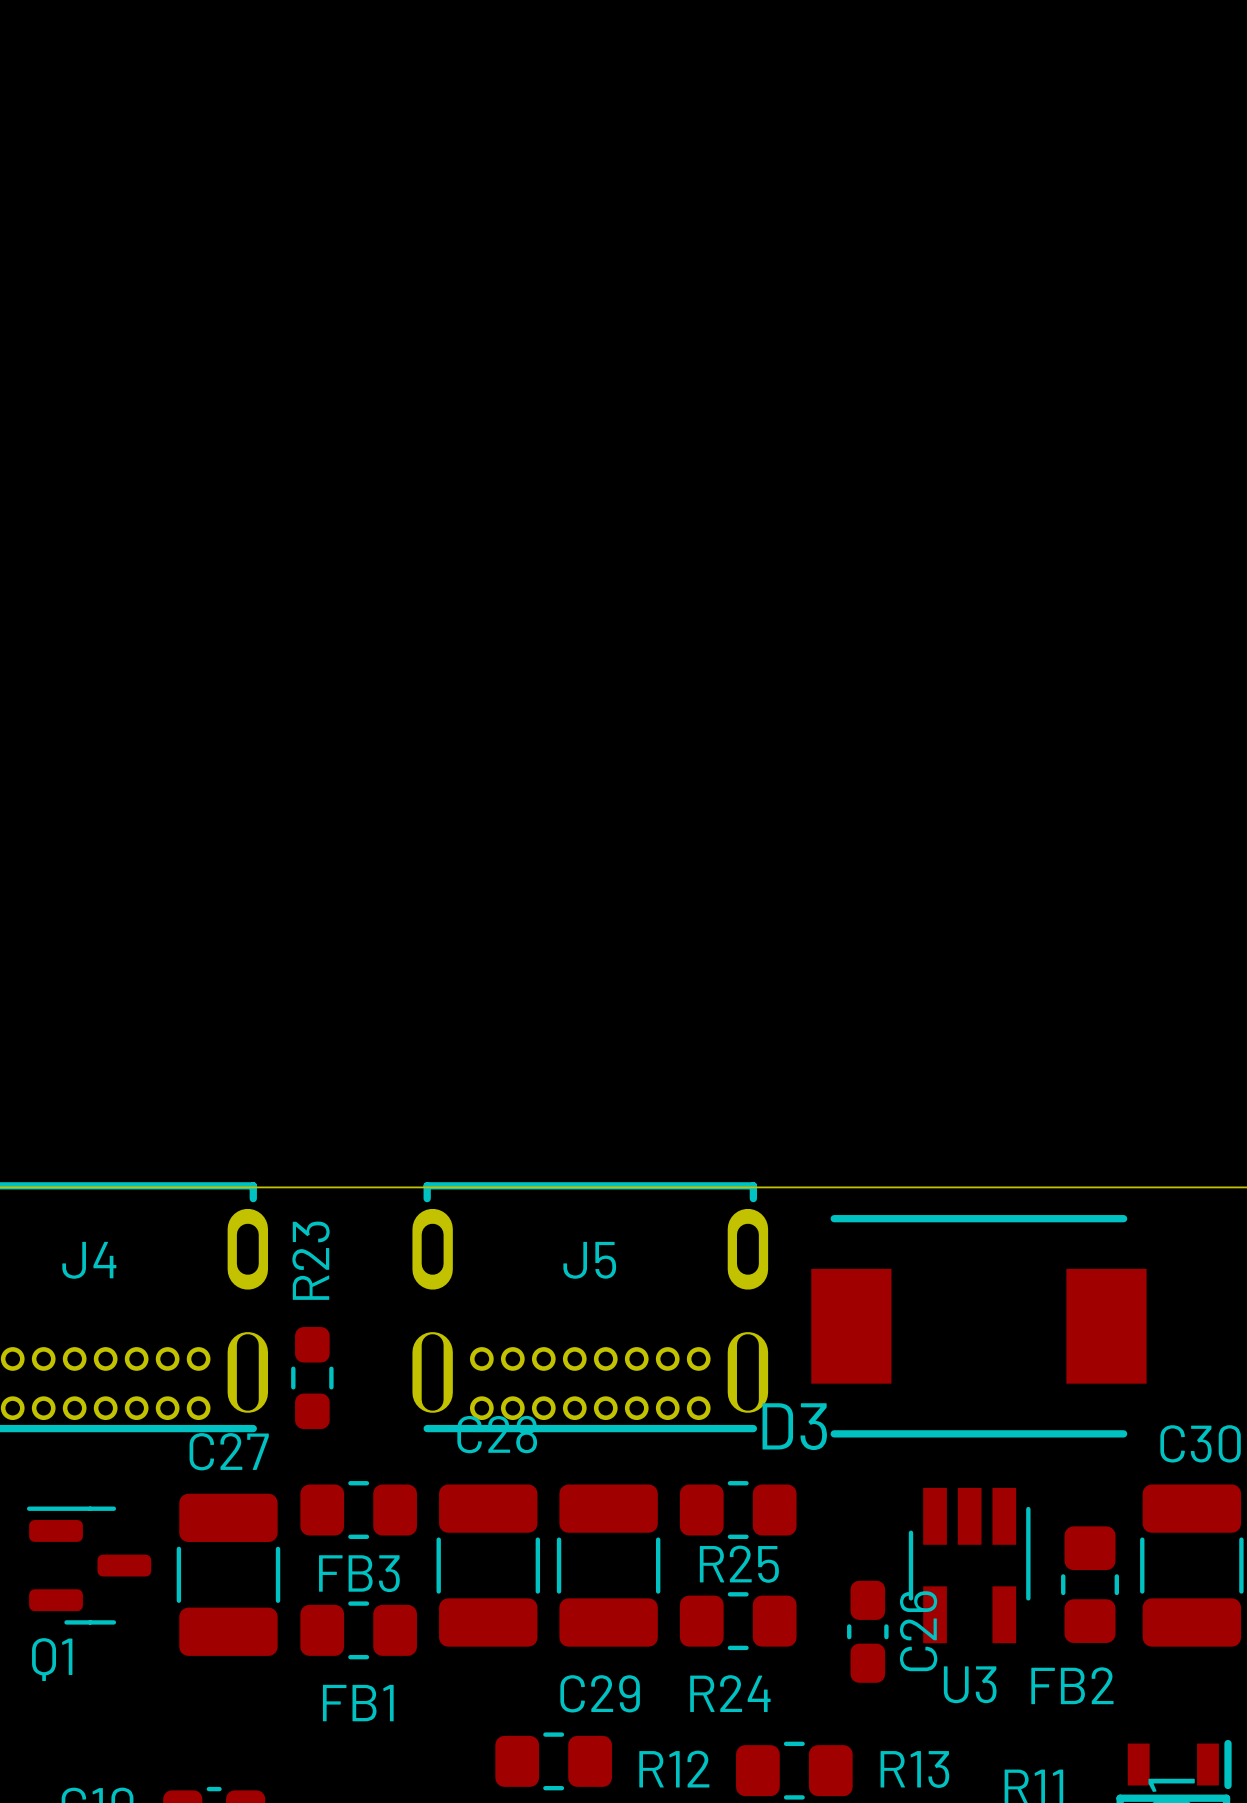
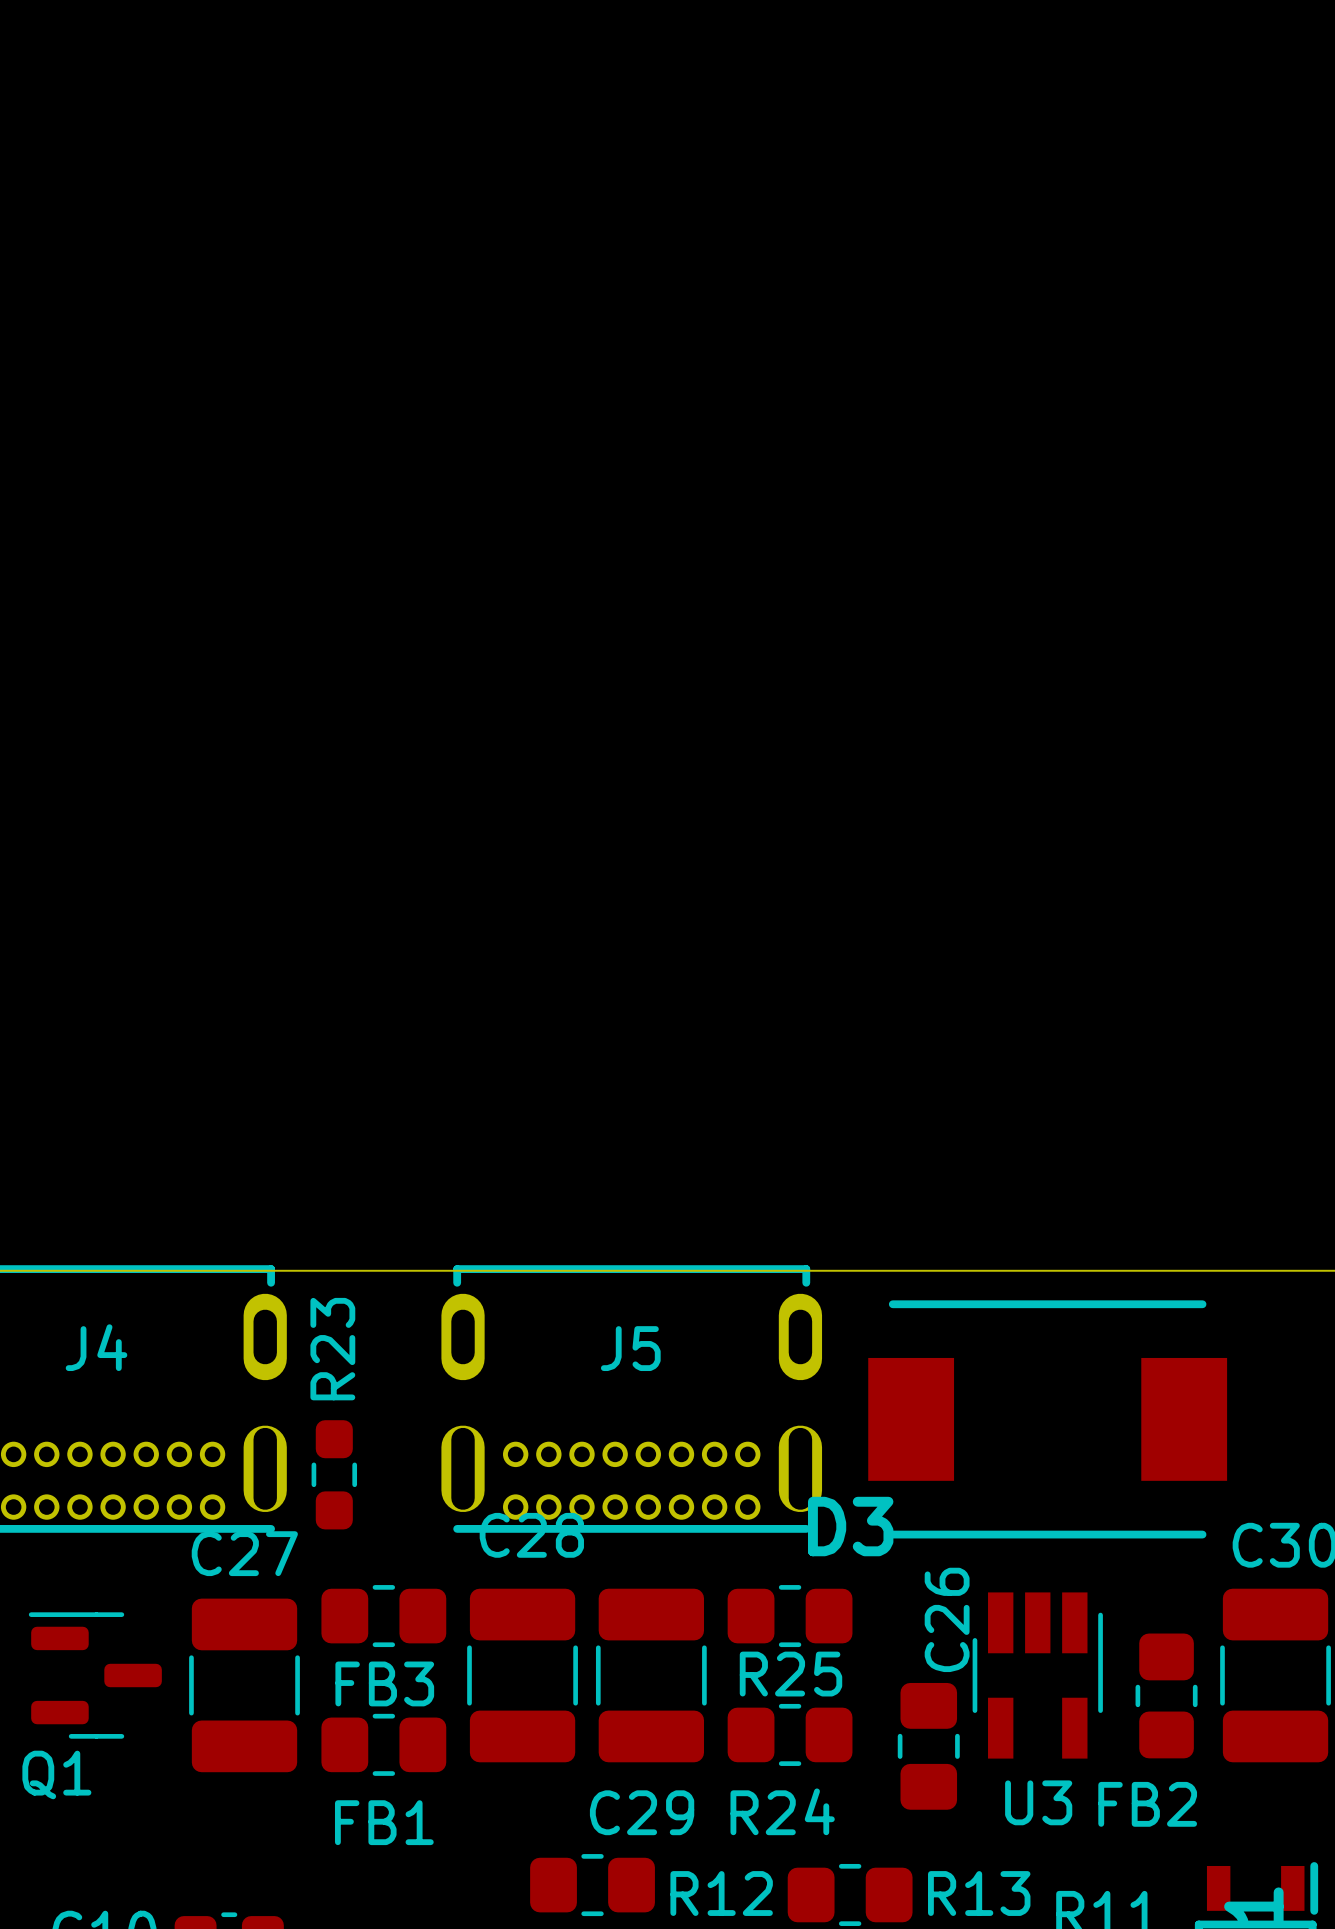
C26 footprint: [847, 1580, 889, 1683] -> [897, 1682, 960, 1810]
C26 name position: C26 (918, 1631) -> C26 (947, 1619)

